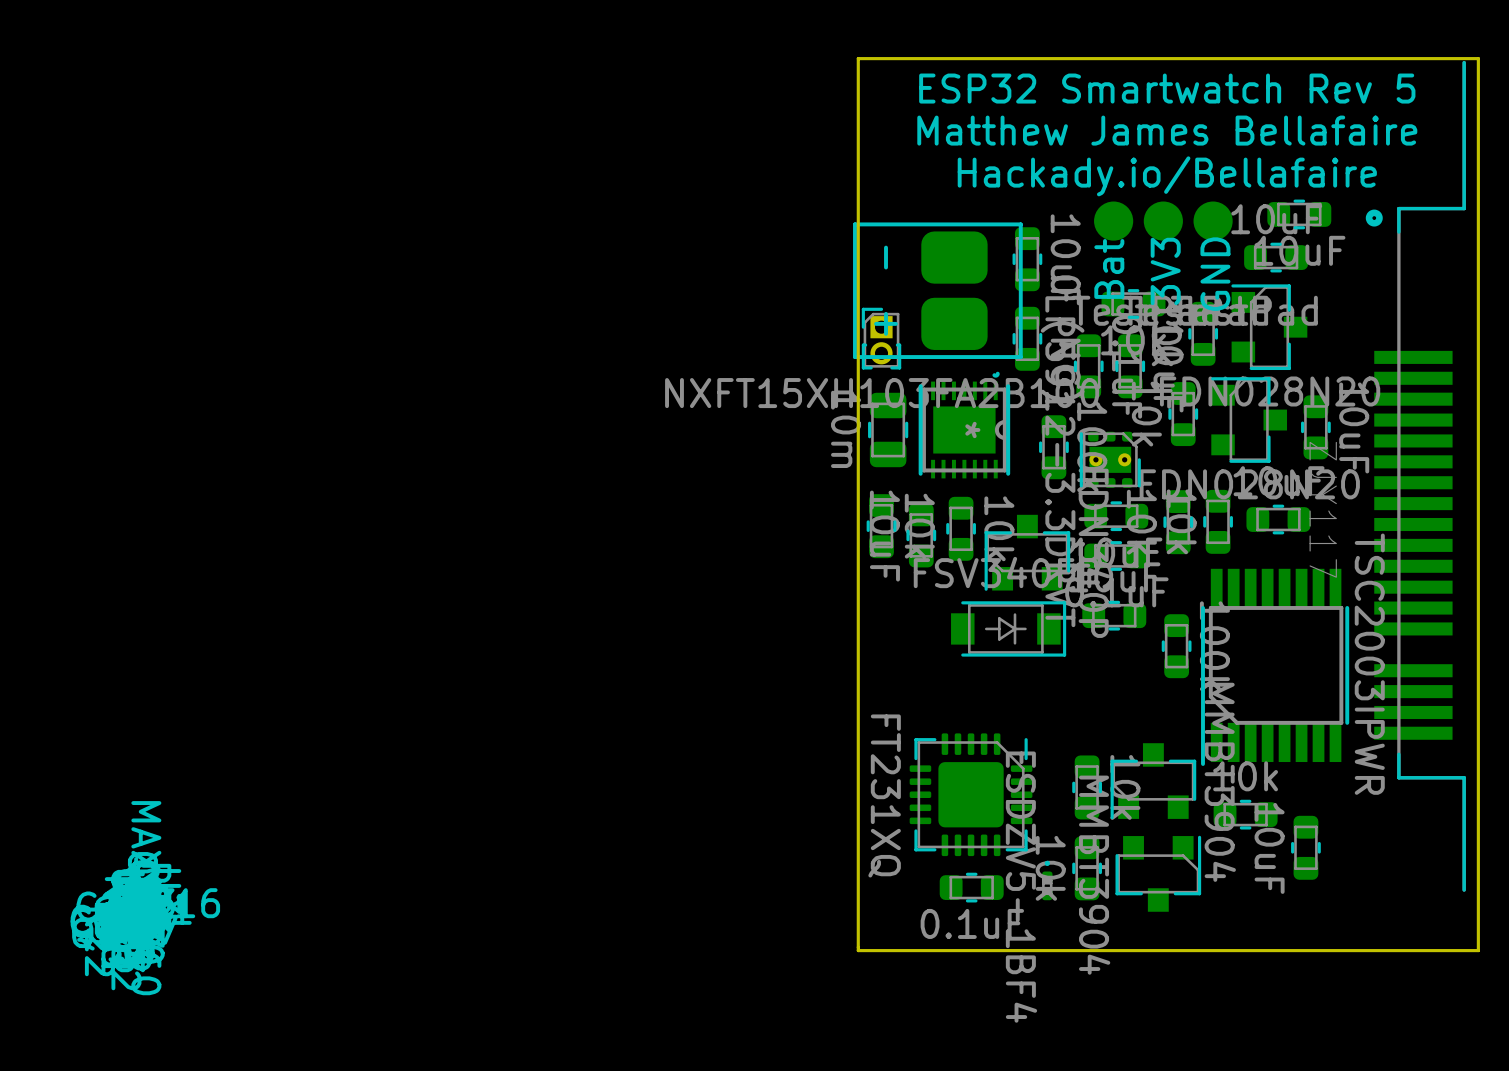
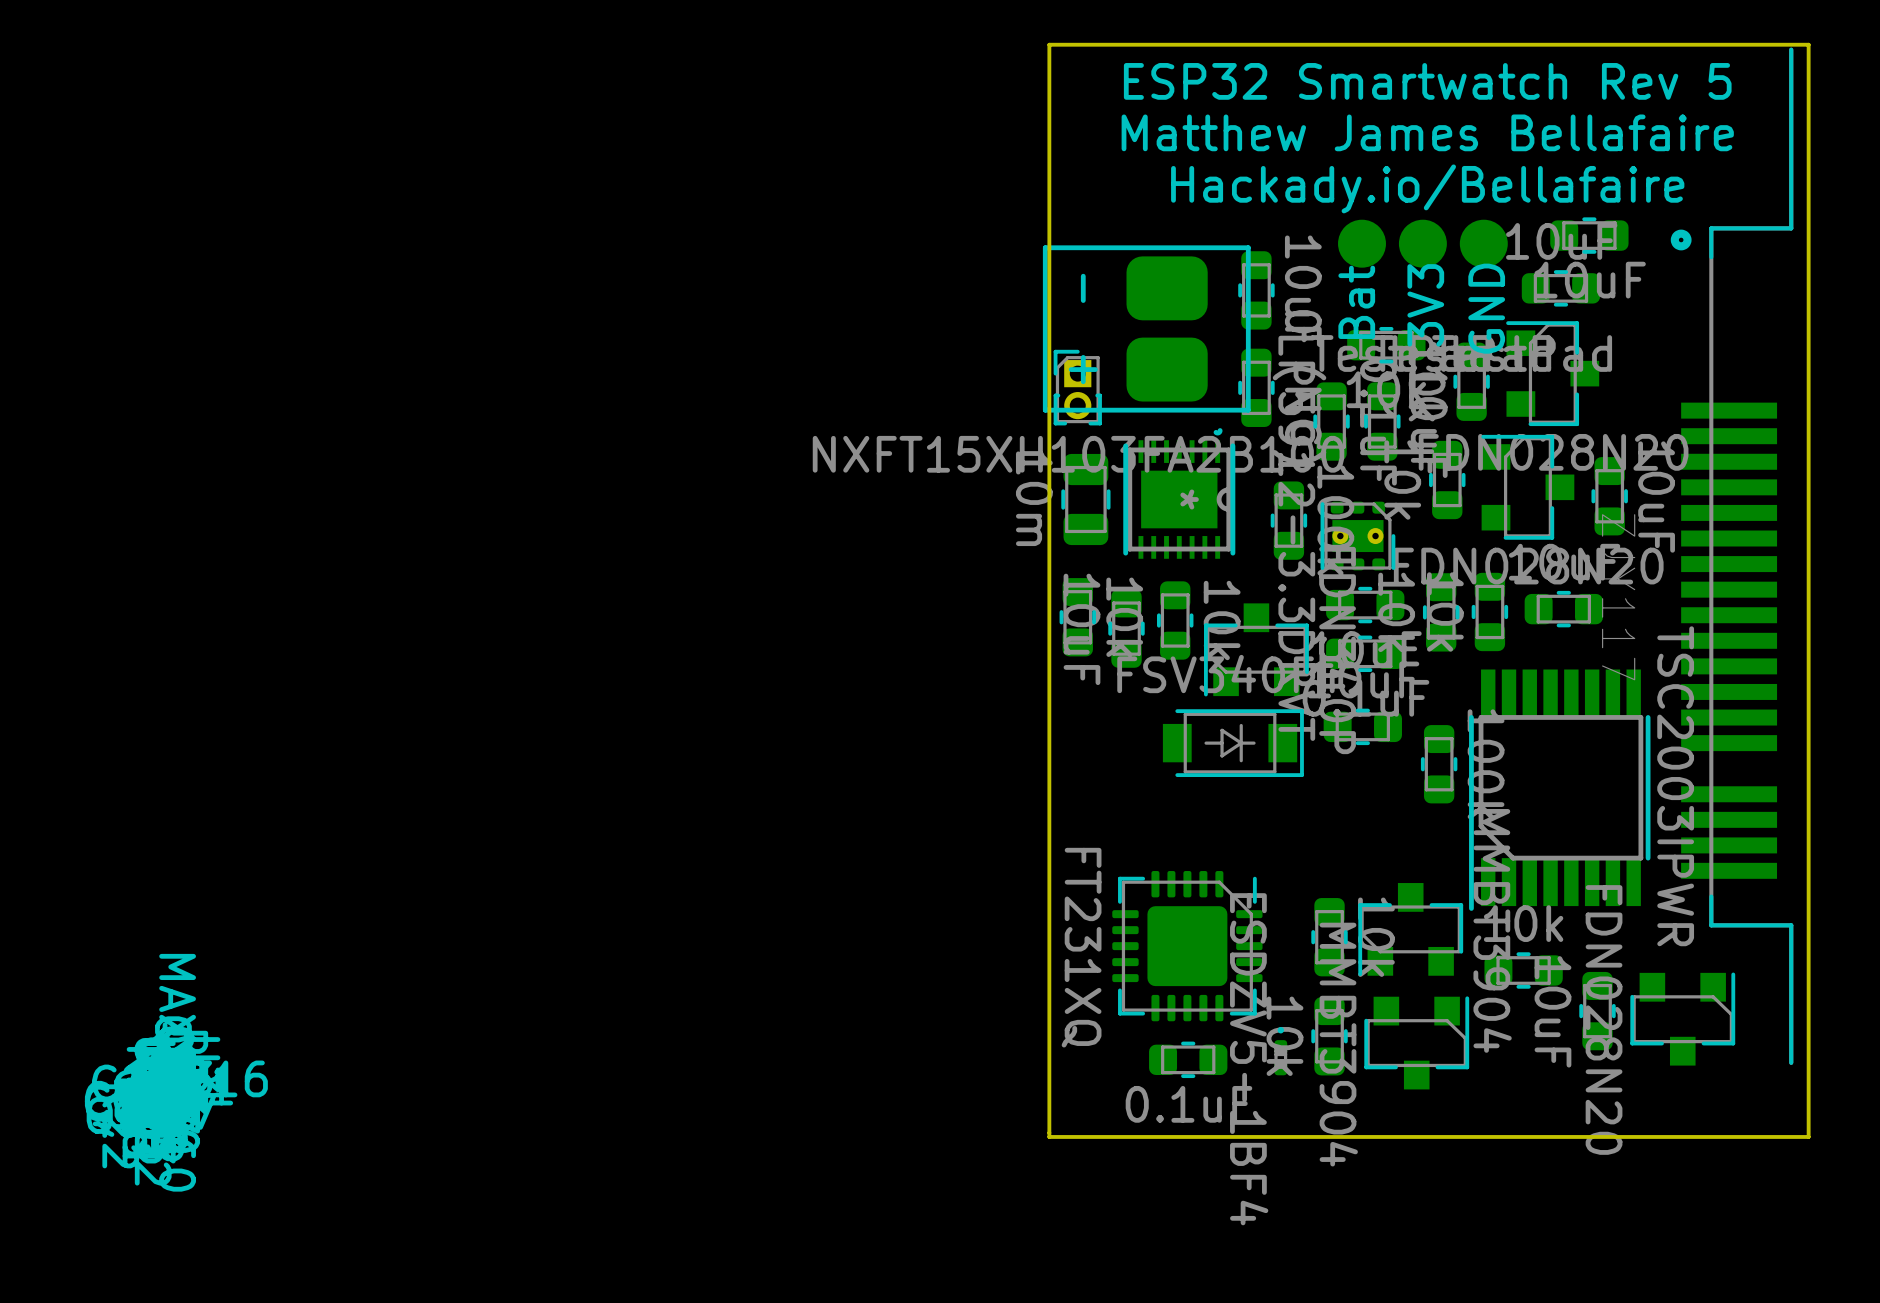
part: none -> FDN028N20 (1682, 1019)

